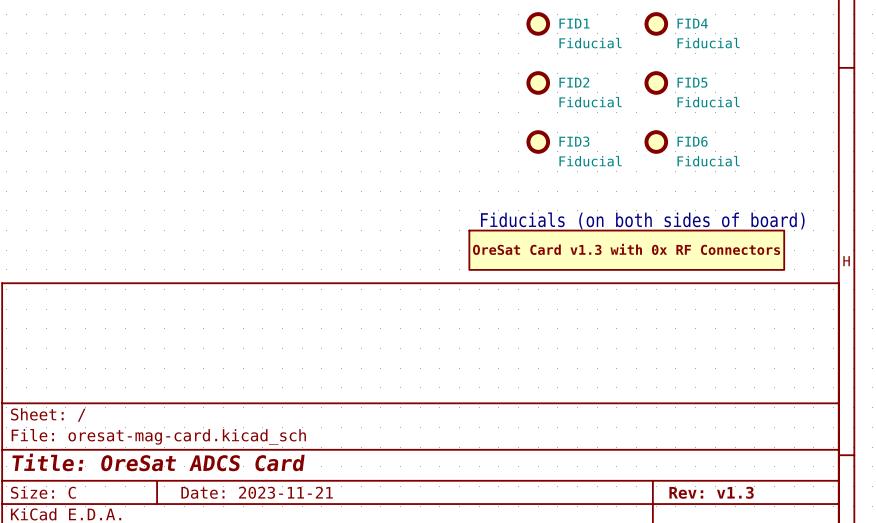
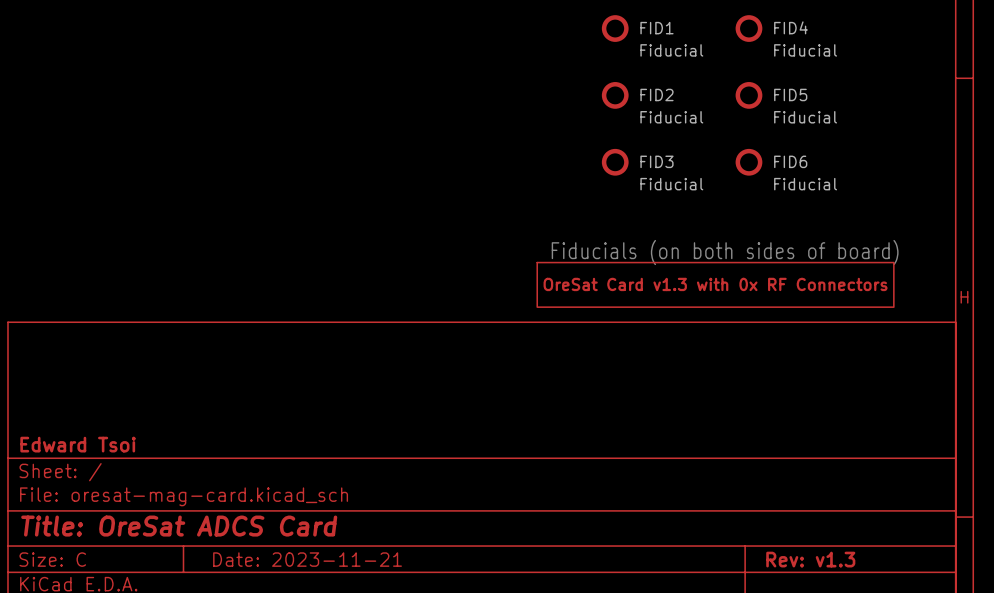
title block: none -> Edward Tsoi (78, 444)

